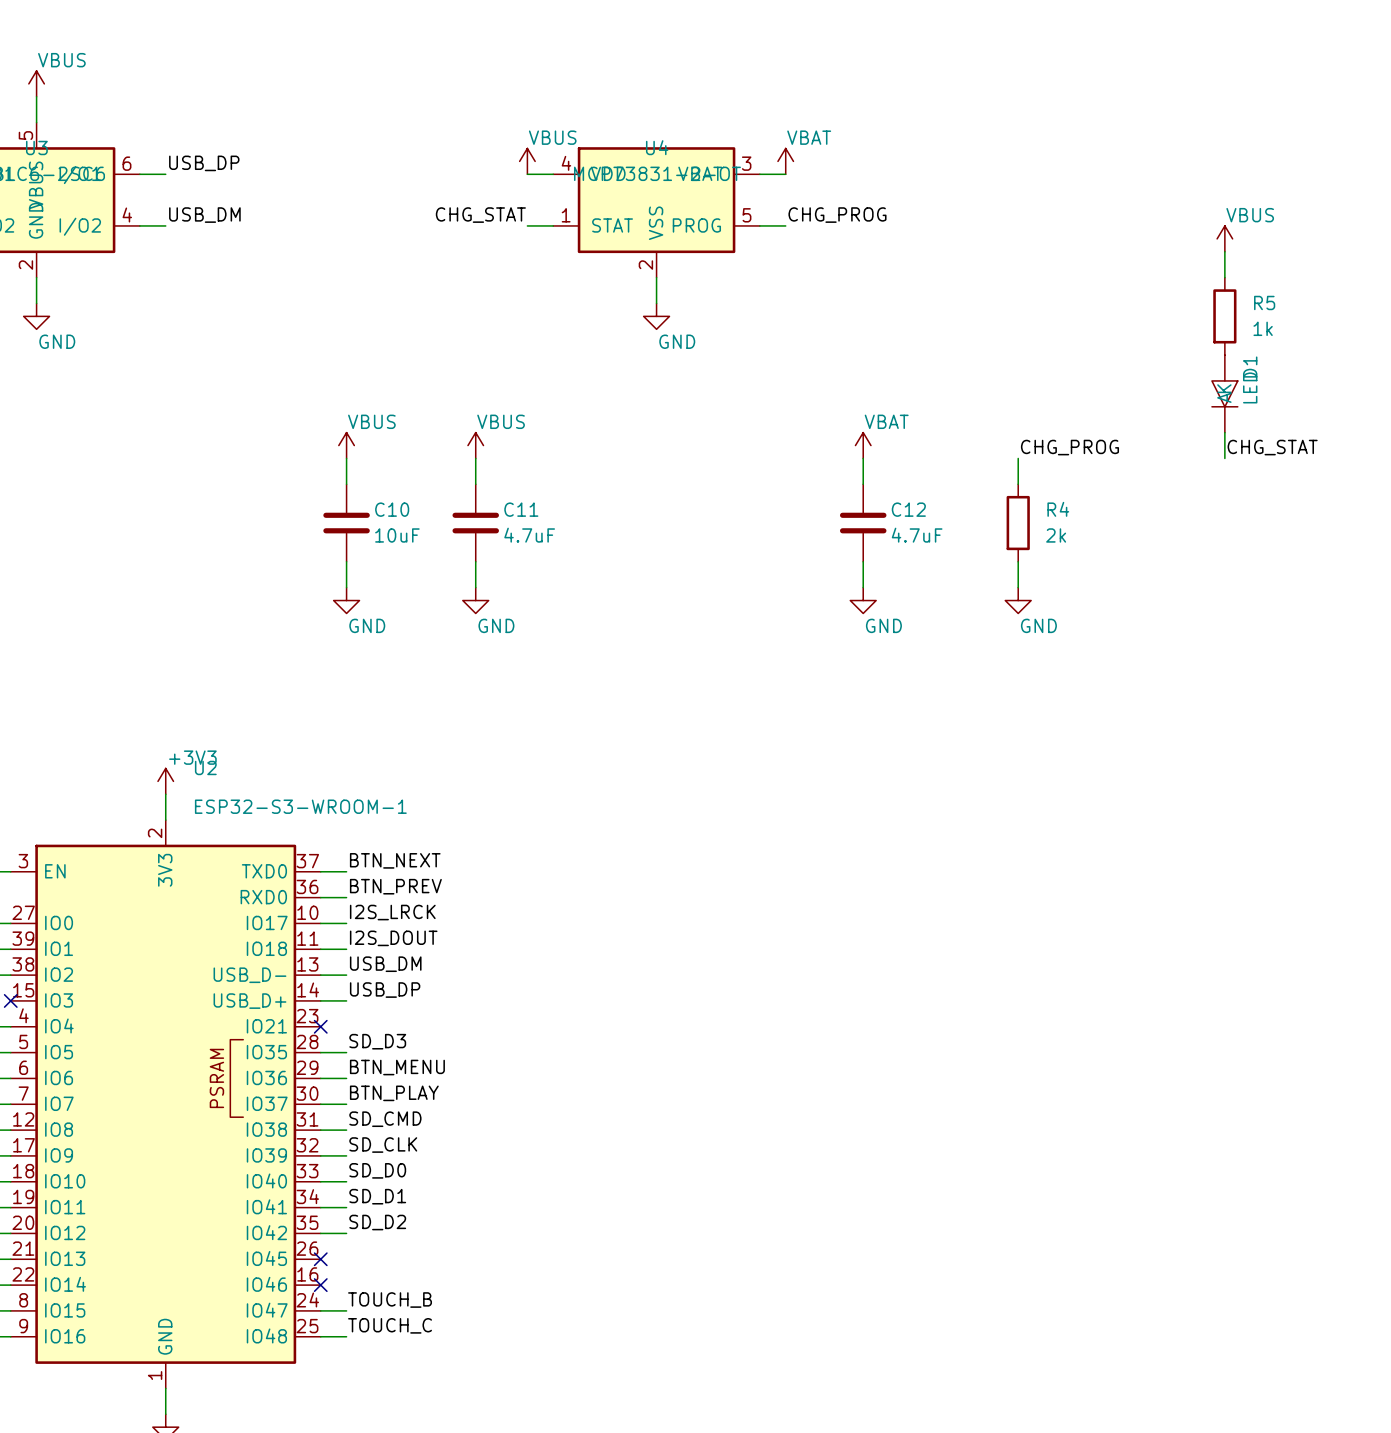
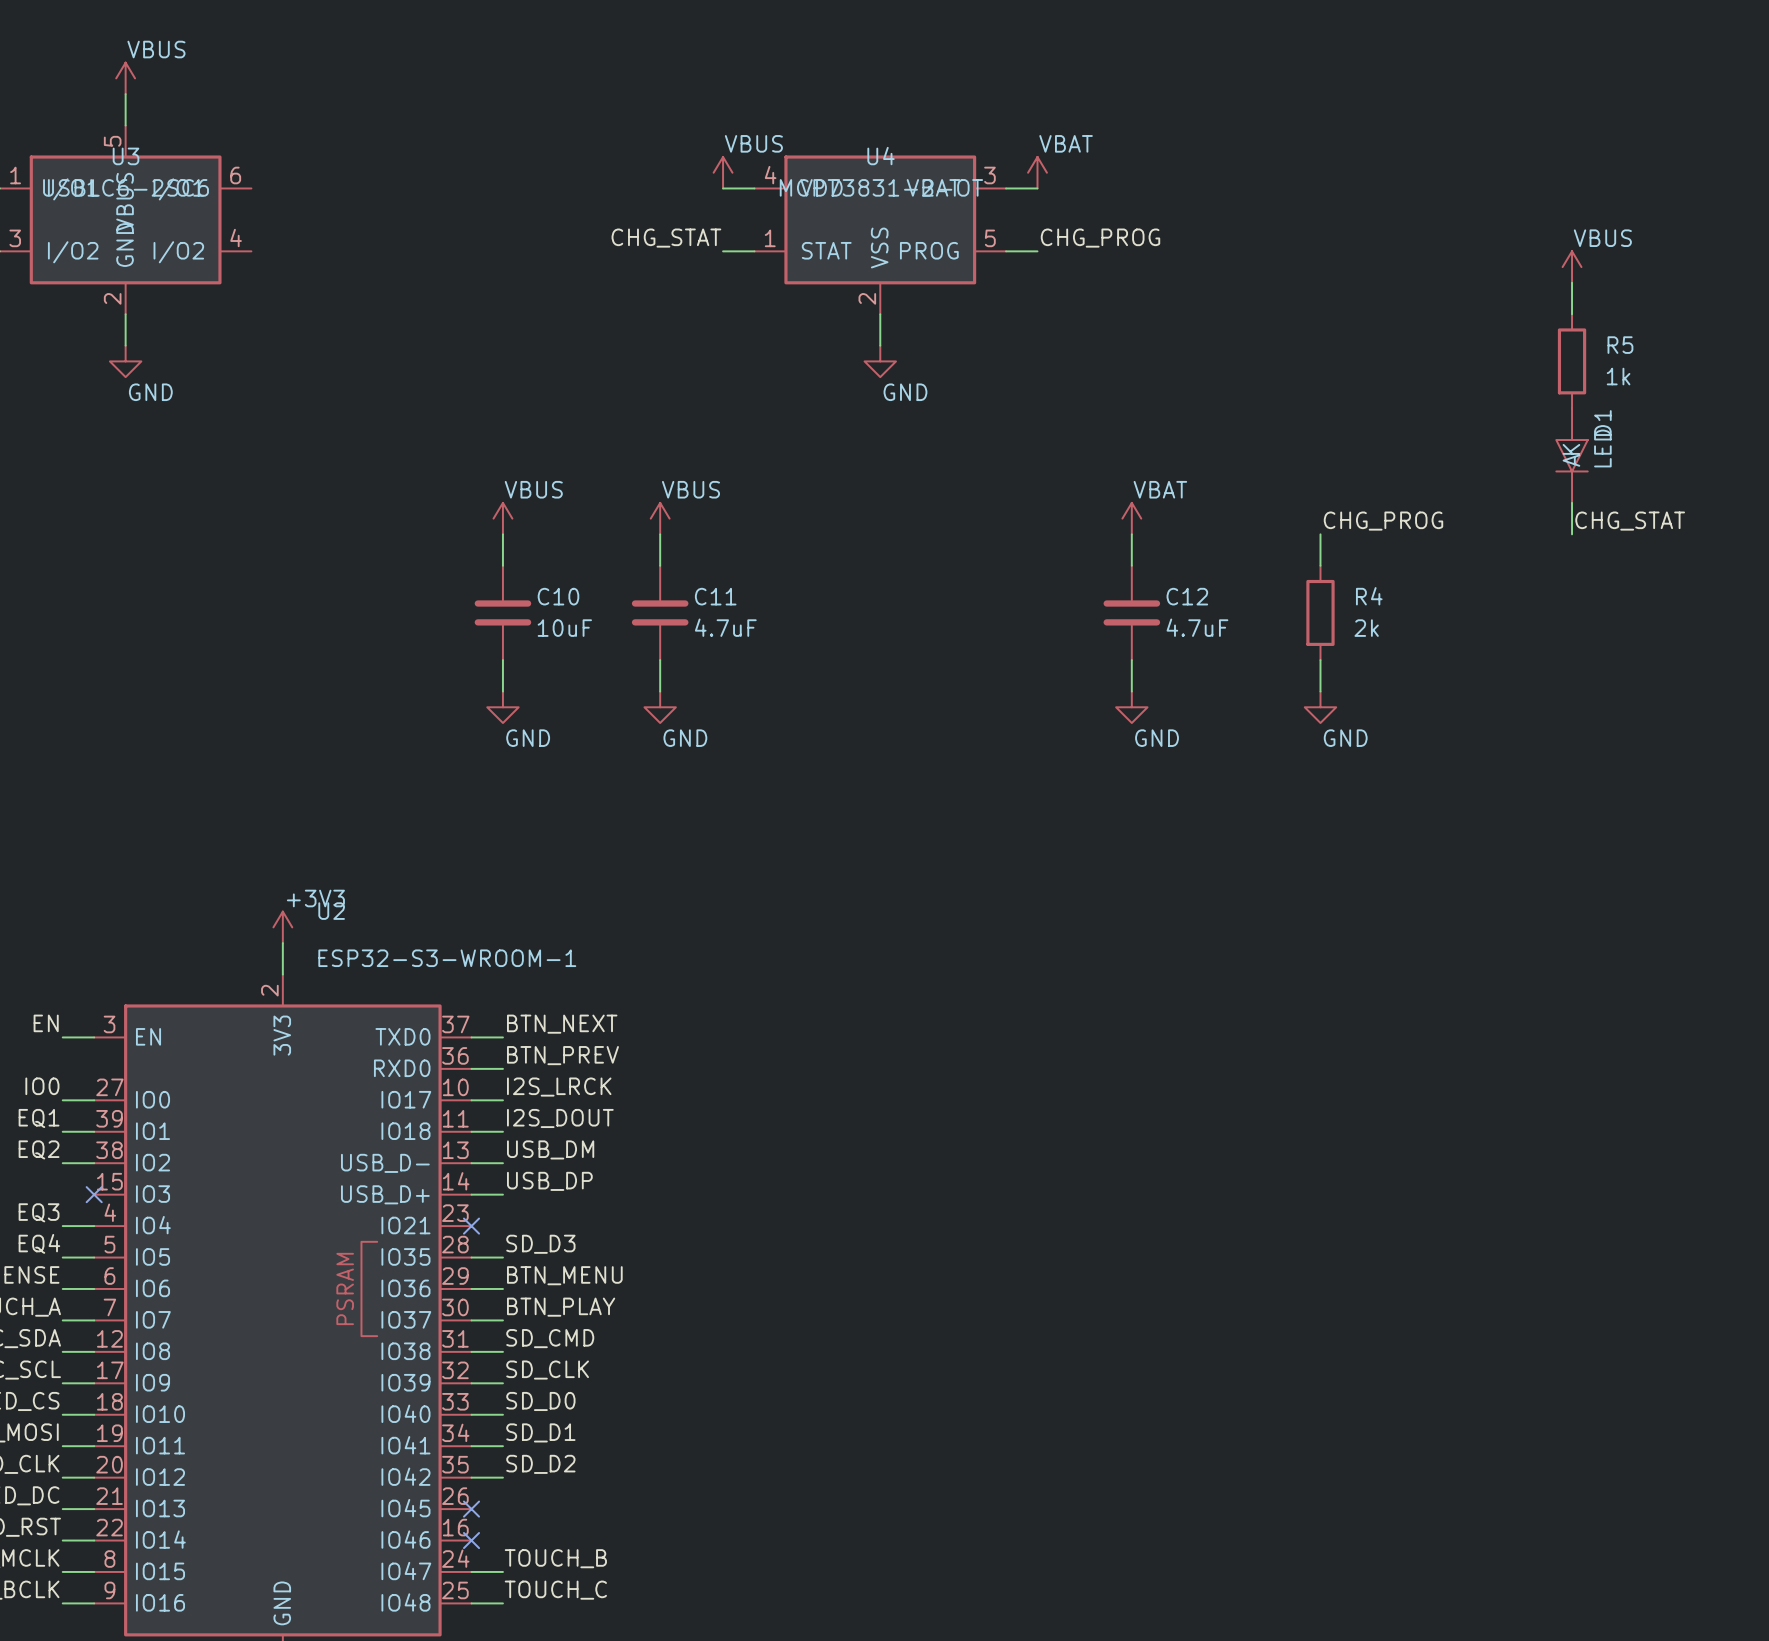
label: USB_DP (204, 163) -> none
wire: (139, 174) (165, 174) -> none
label: USB_DM (204, 215) -> none
wire: (139, 225) (165, 225) -> none

